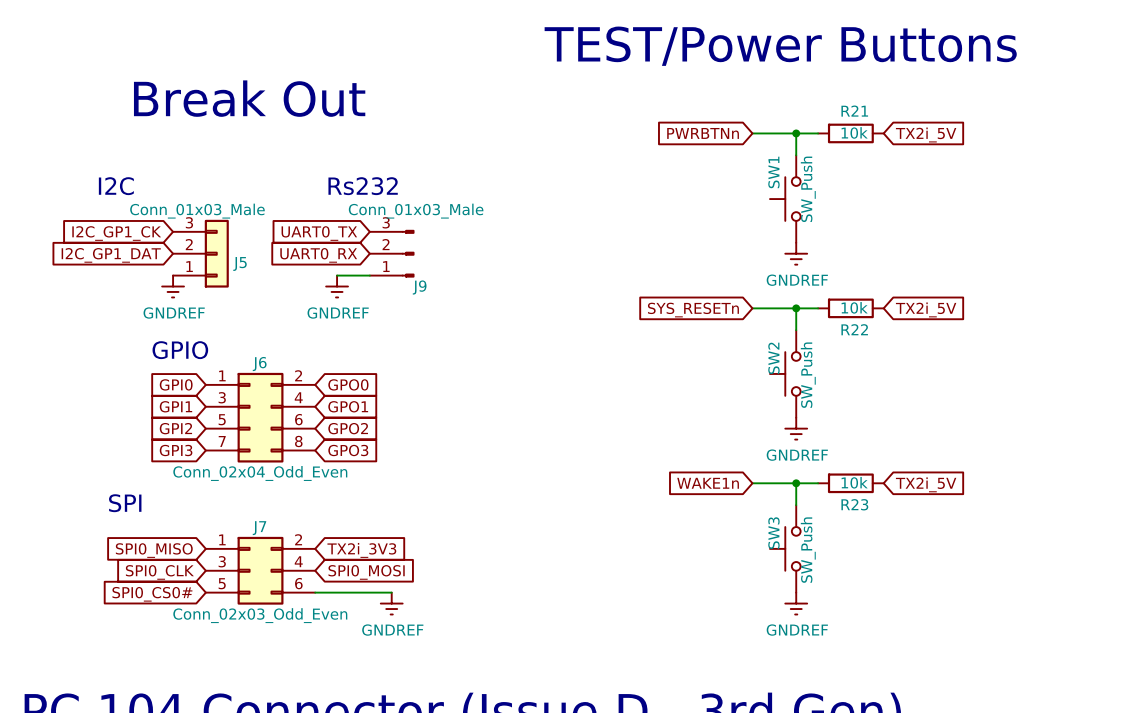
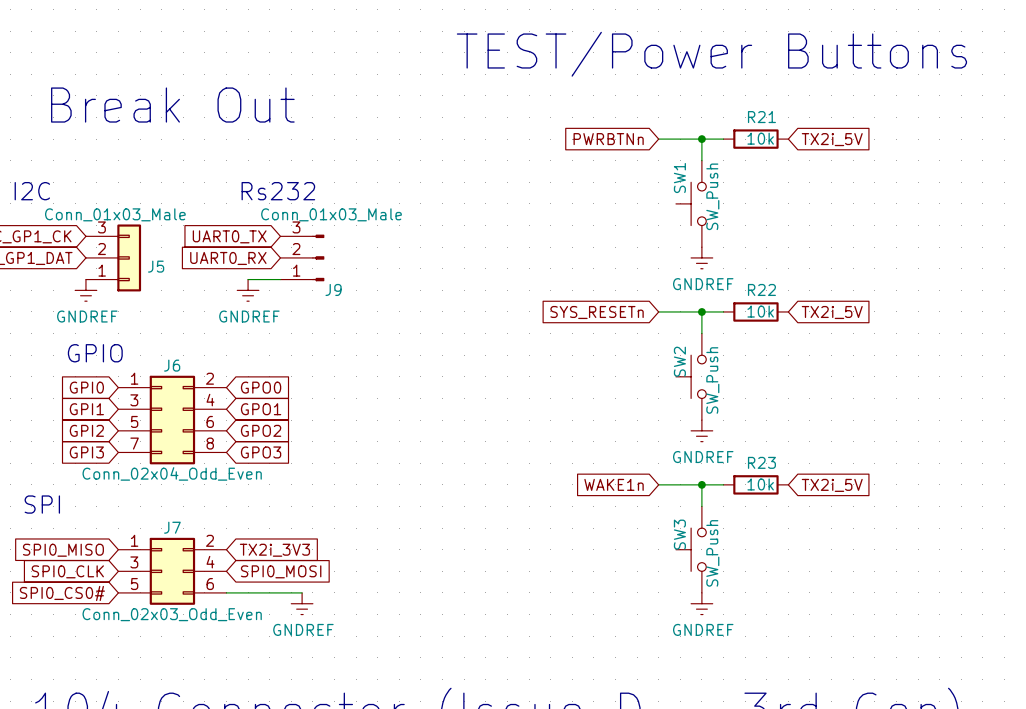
R22 name position: R22 (854, 329) -> R22 (761, 289)
R23 name position: R23 (854, 504) -> R23 (761, 462)

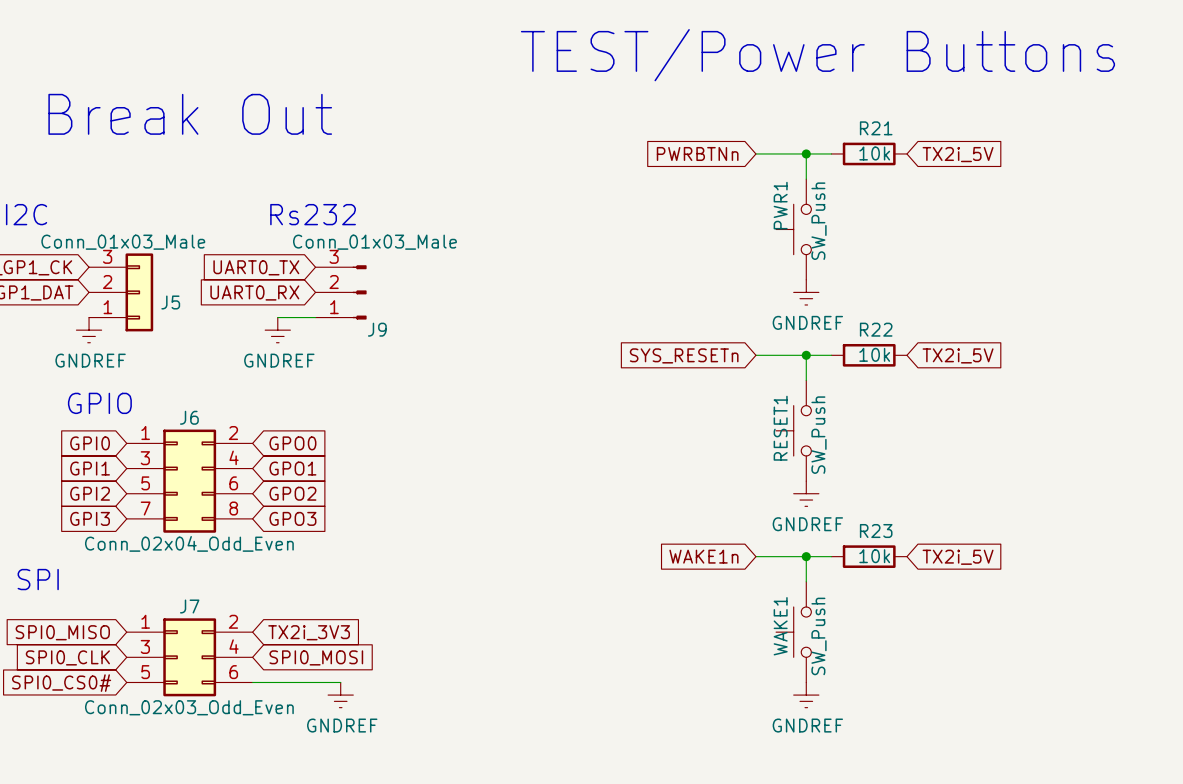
SW1 name: SW1 (679, 178) -> PWR1 (780, 205)
SW2 name: SW2 (679, 361) -> RESET1 (780, 428)
SW3 name: SW3 (679, 534) -> WAKE1 (780, 626)

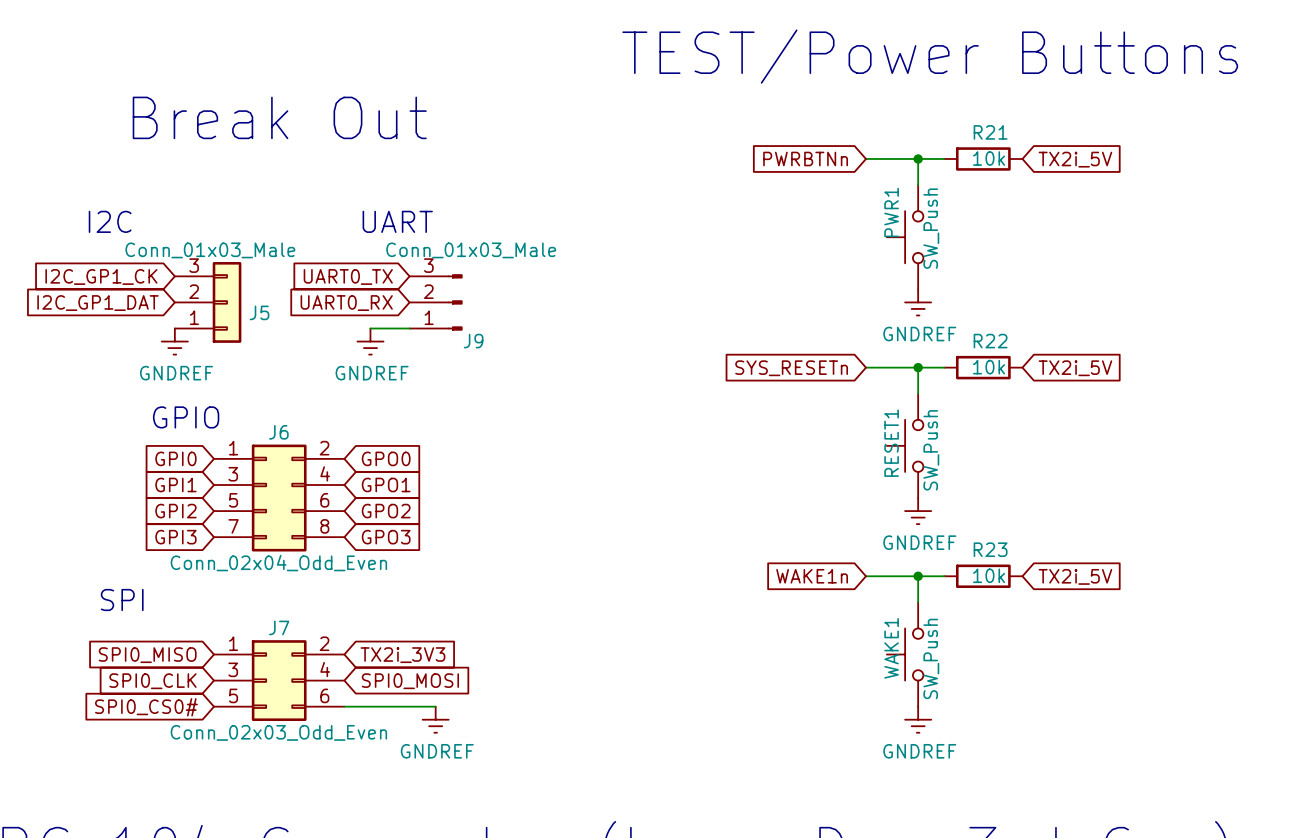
text: Rs232 (313, 214) -> UART (397, 221)

